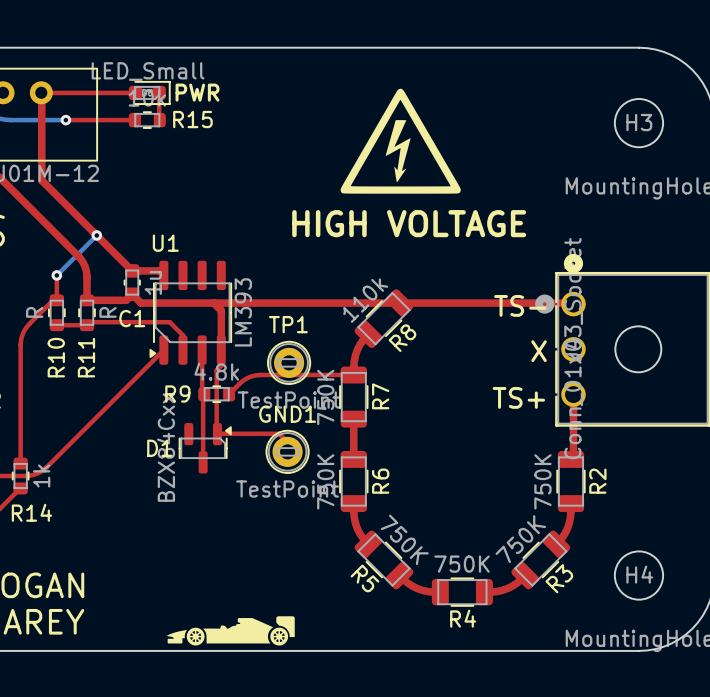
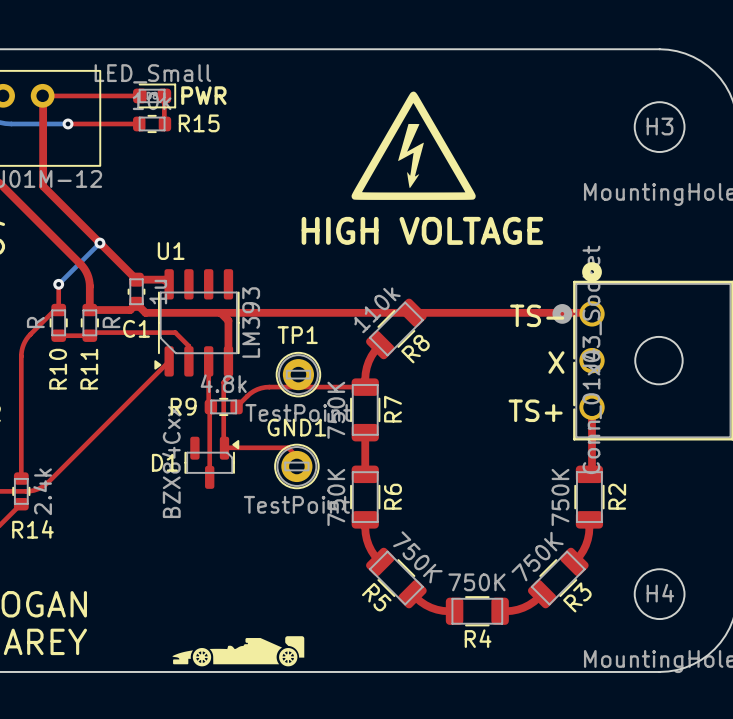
R14 value: 1k (41, 476) -> 2.4k (42, 491)

